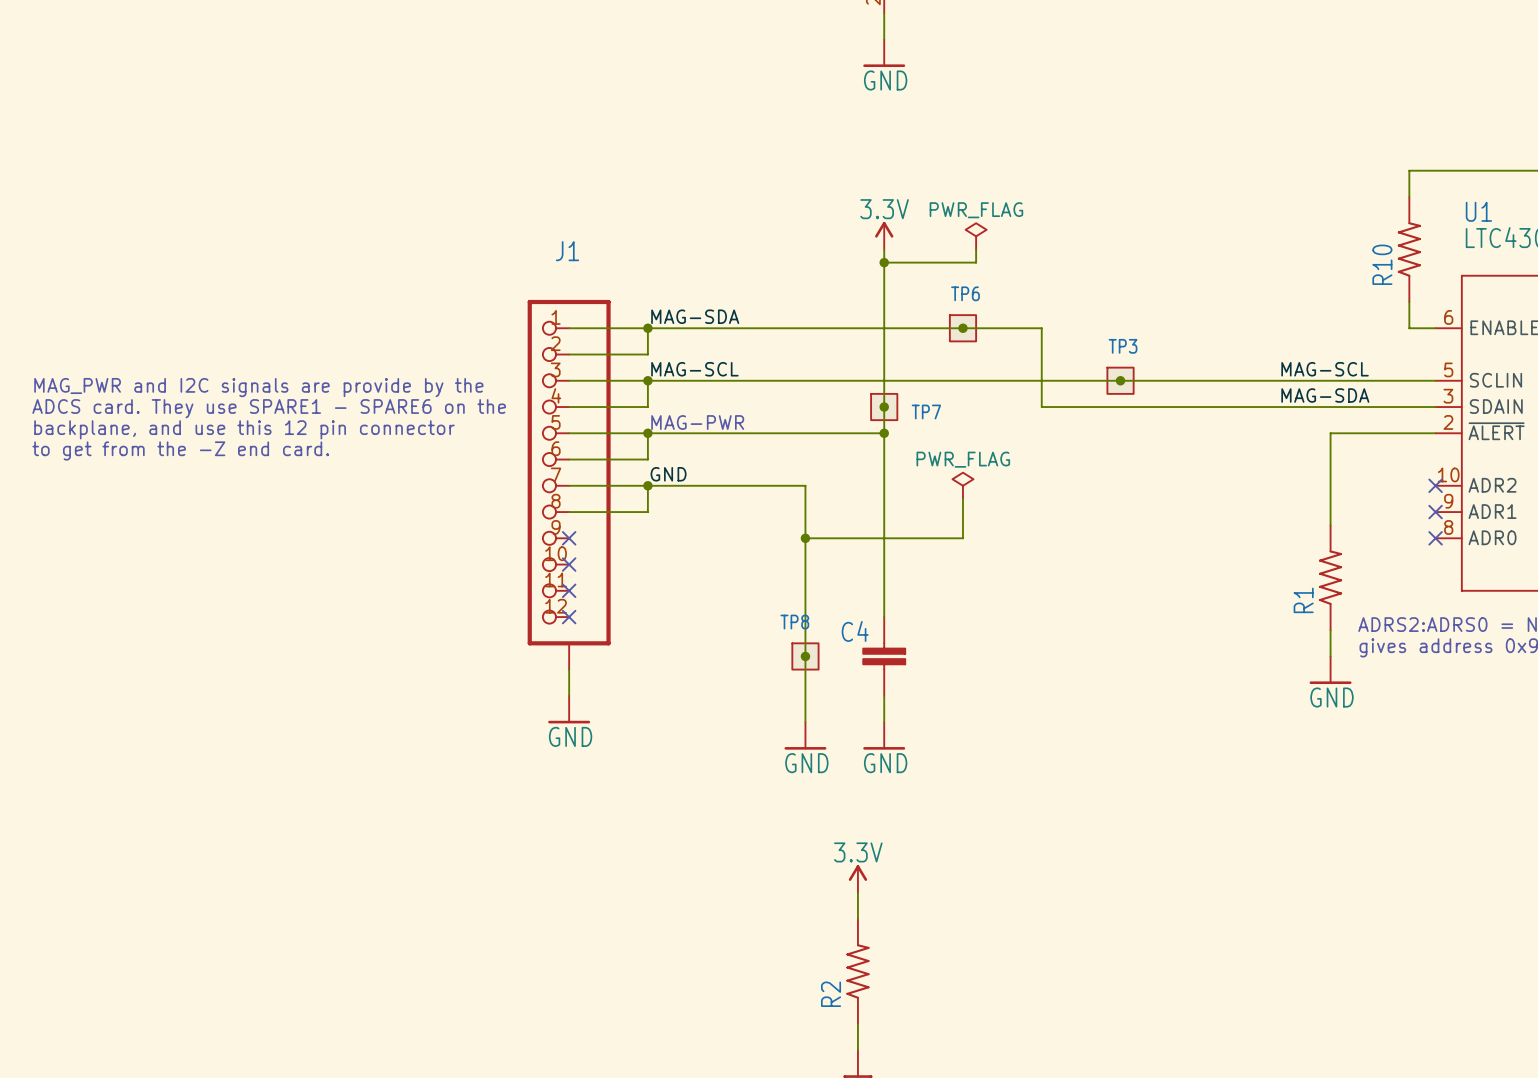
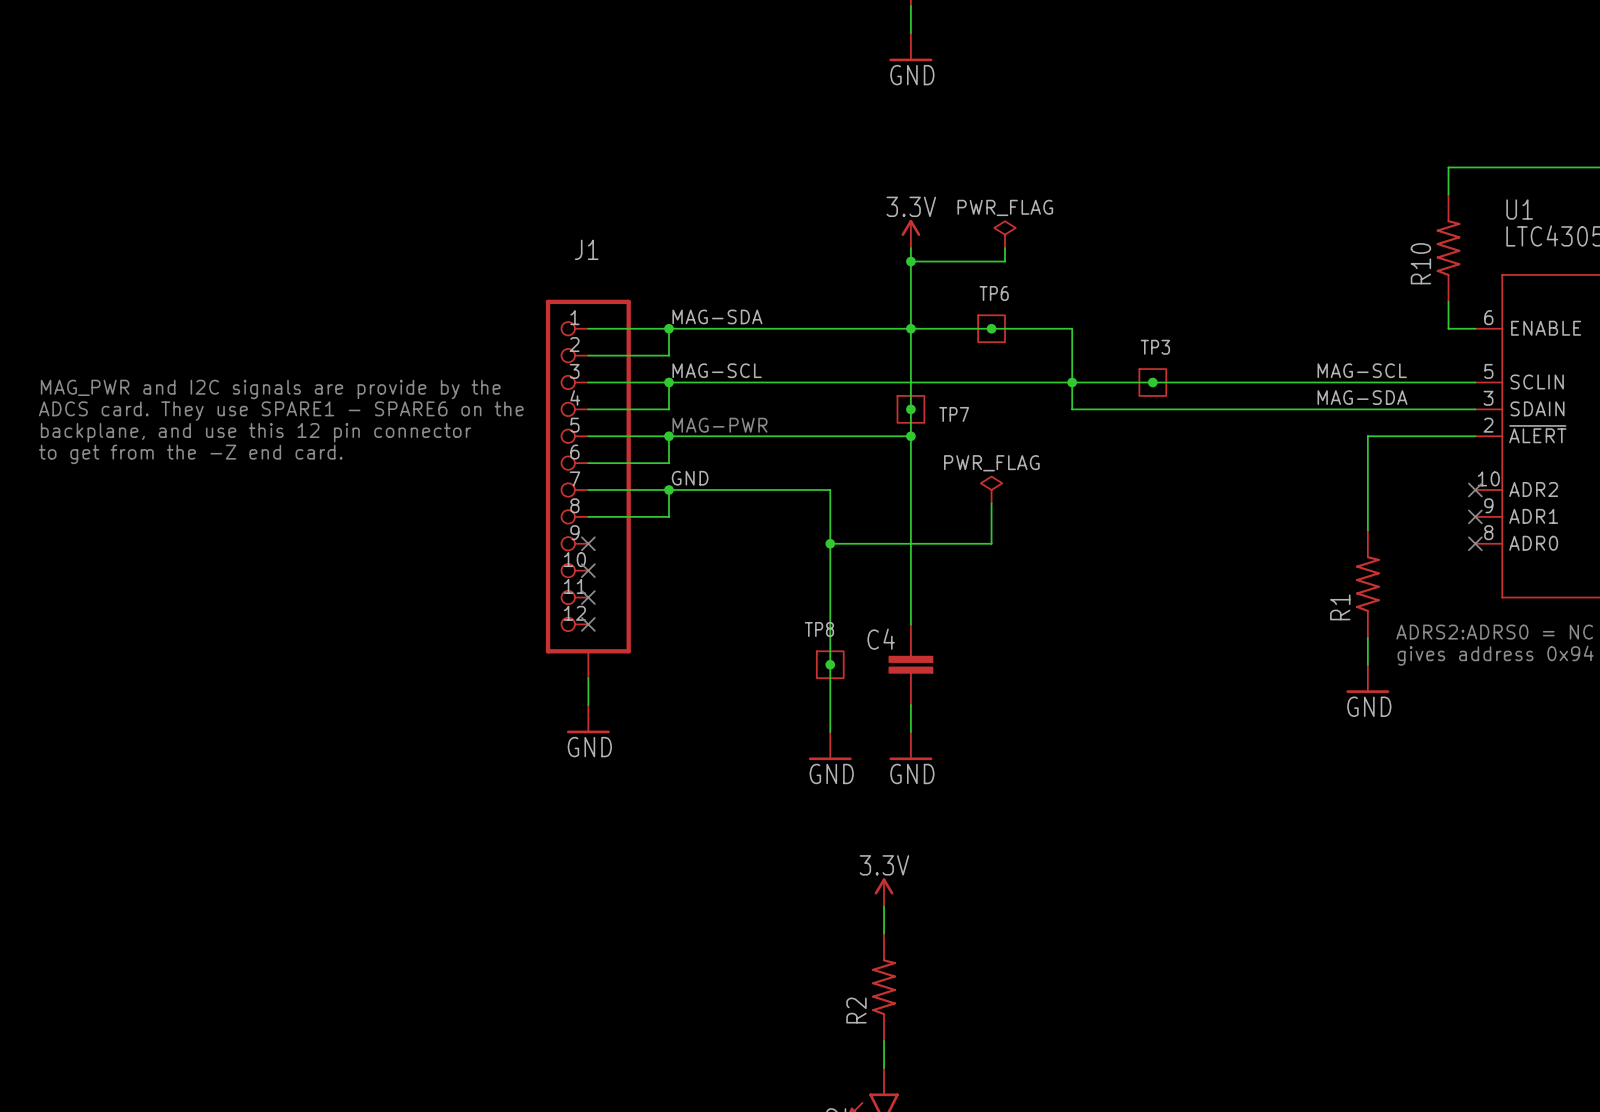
junction: none -> (910, 328)
junction: none -> (1072, 382)

